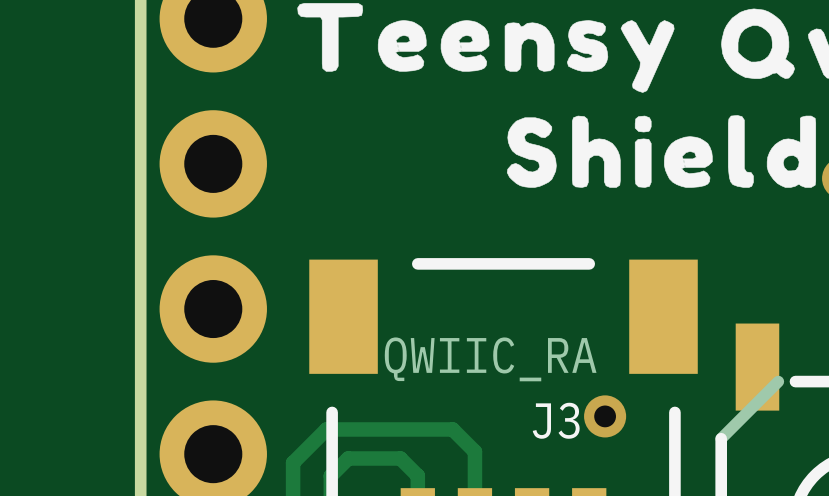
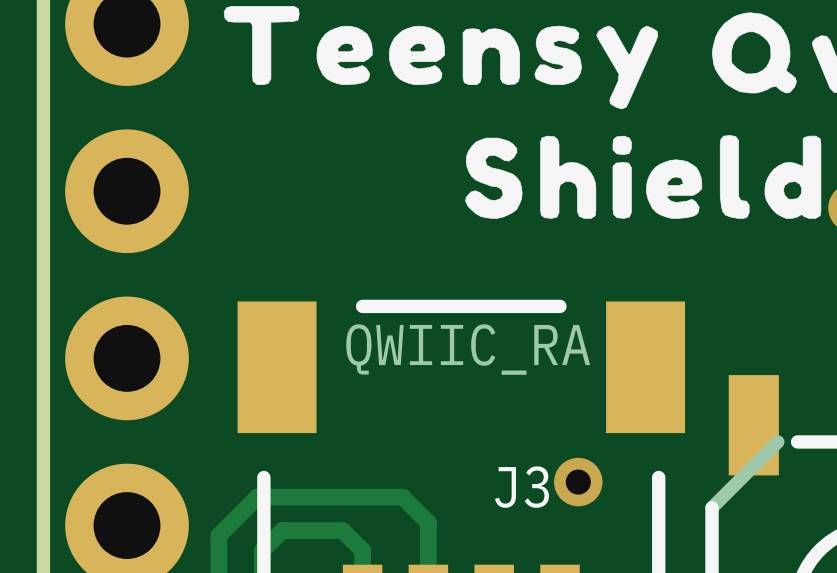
J3 value position: QWIIC_RA (490, 359) -> QWIIC_RA (468, 349)

